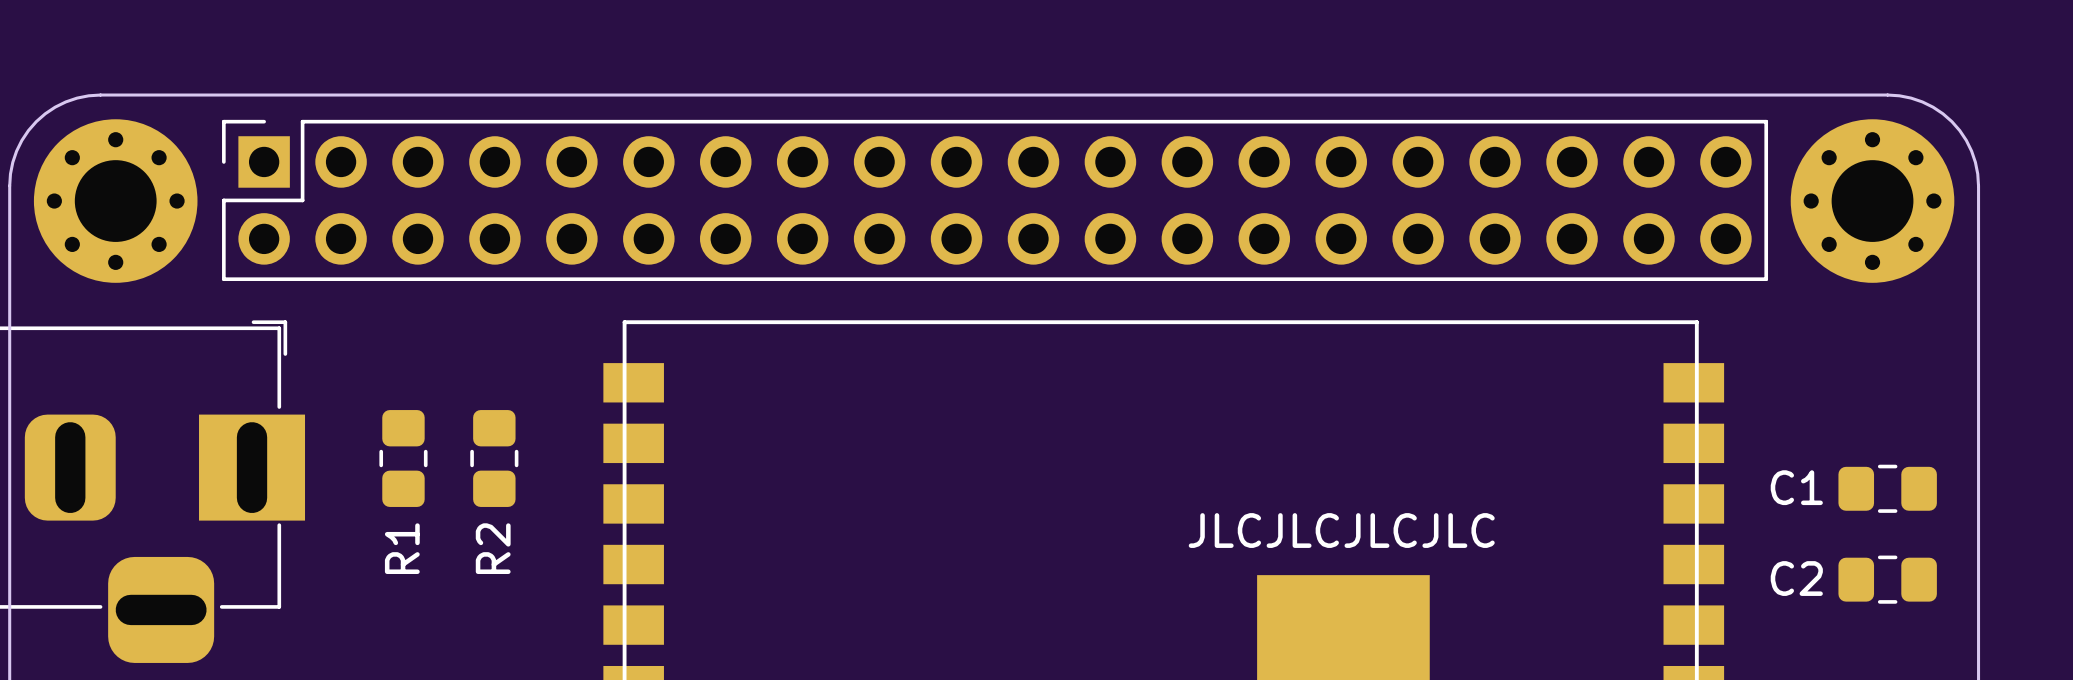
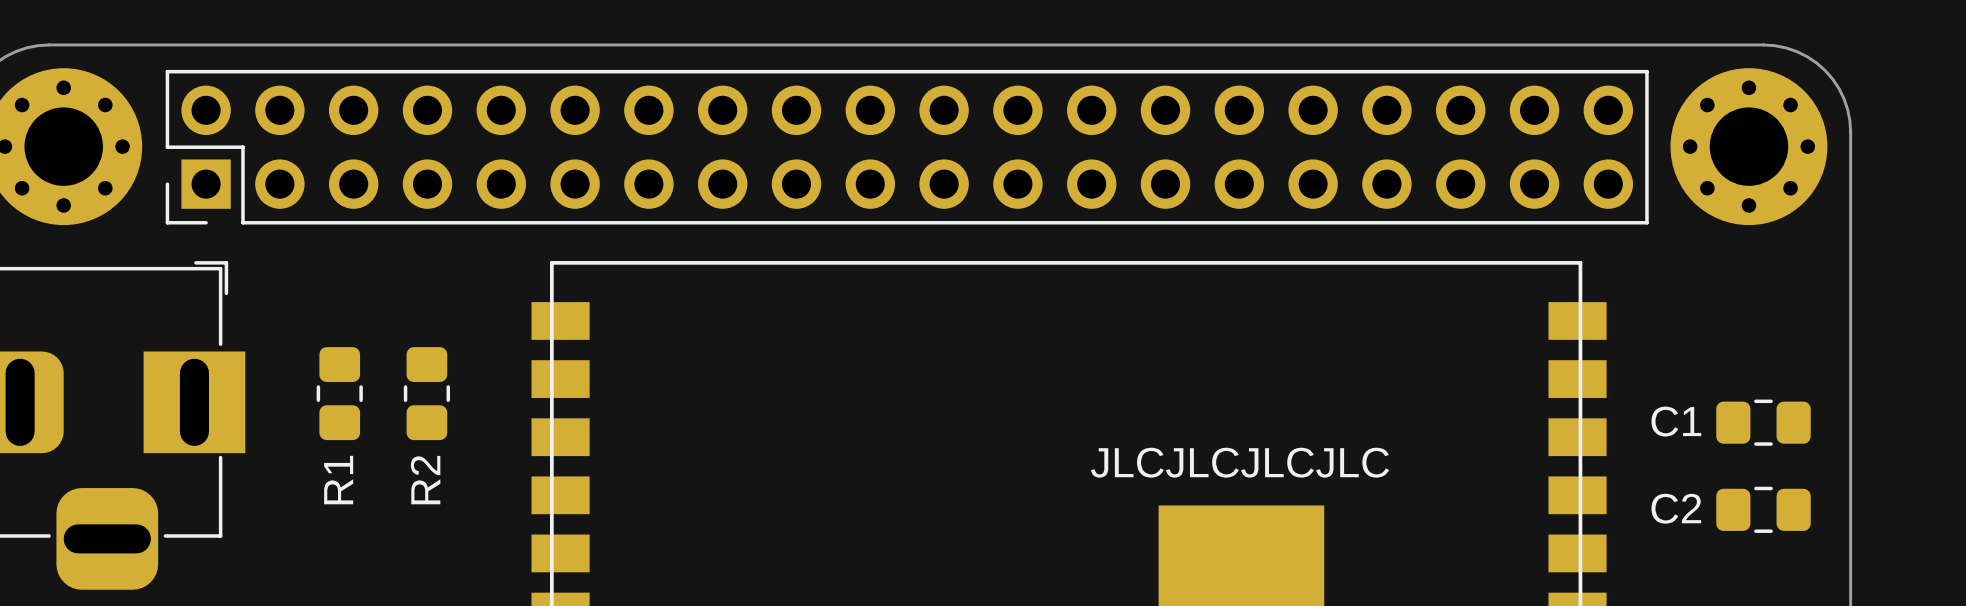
part footprint: [222, 119, 1769, 282] -> [165, 69, 1649, 225]

